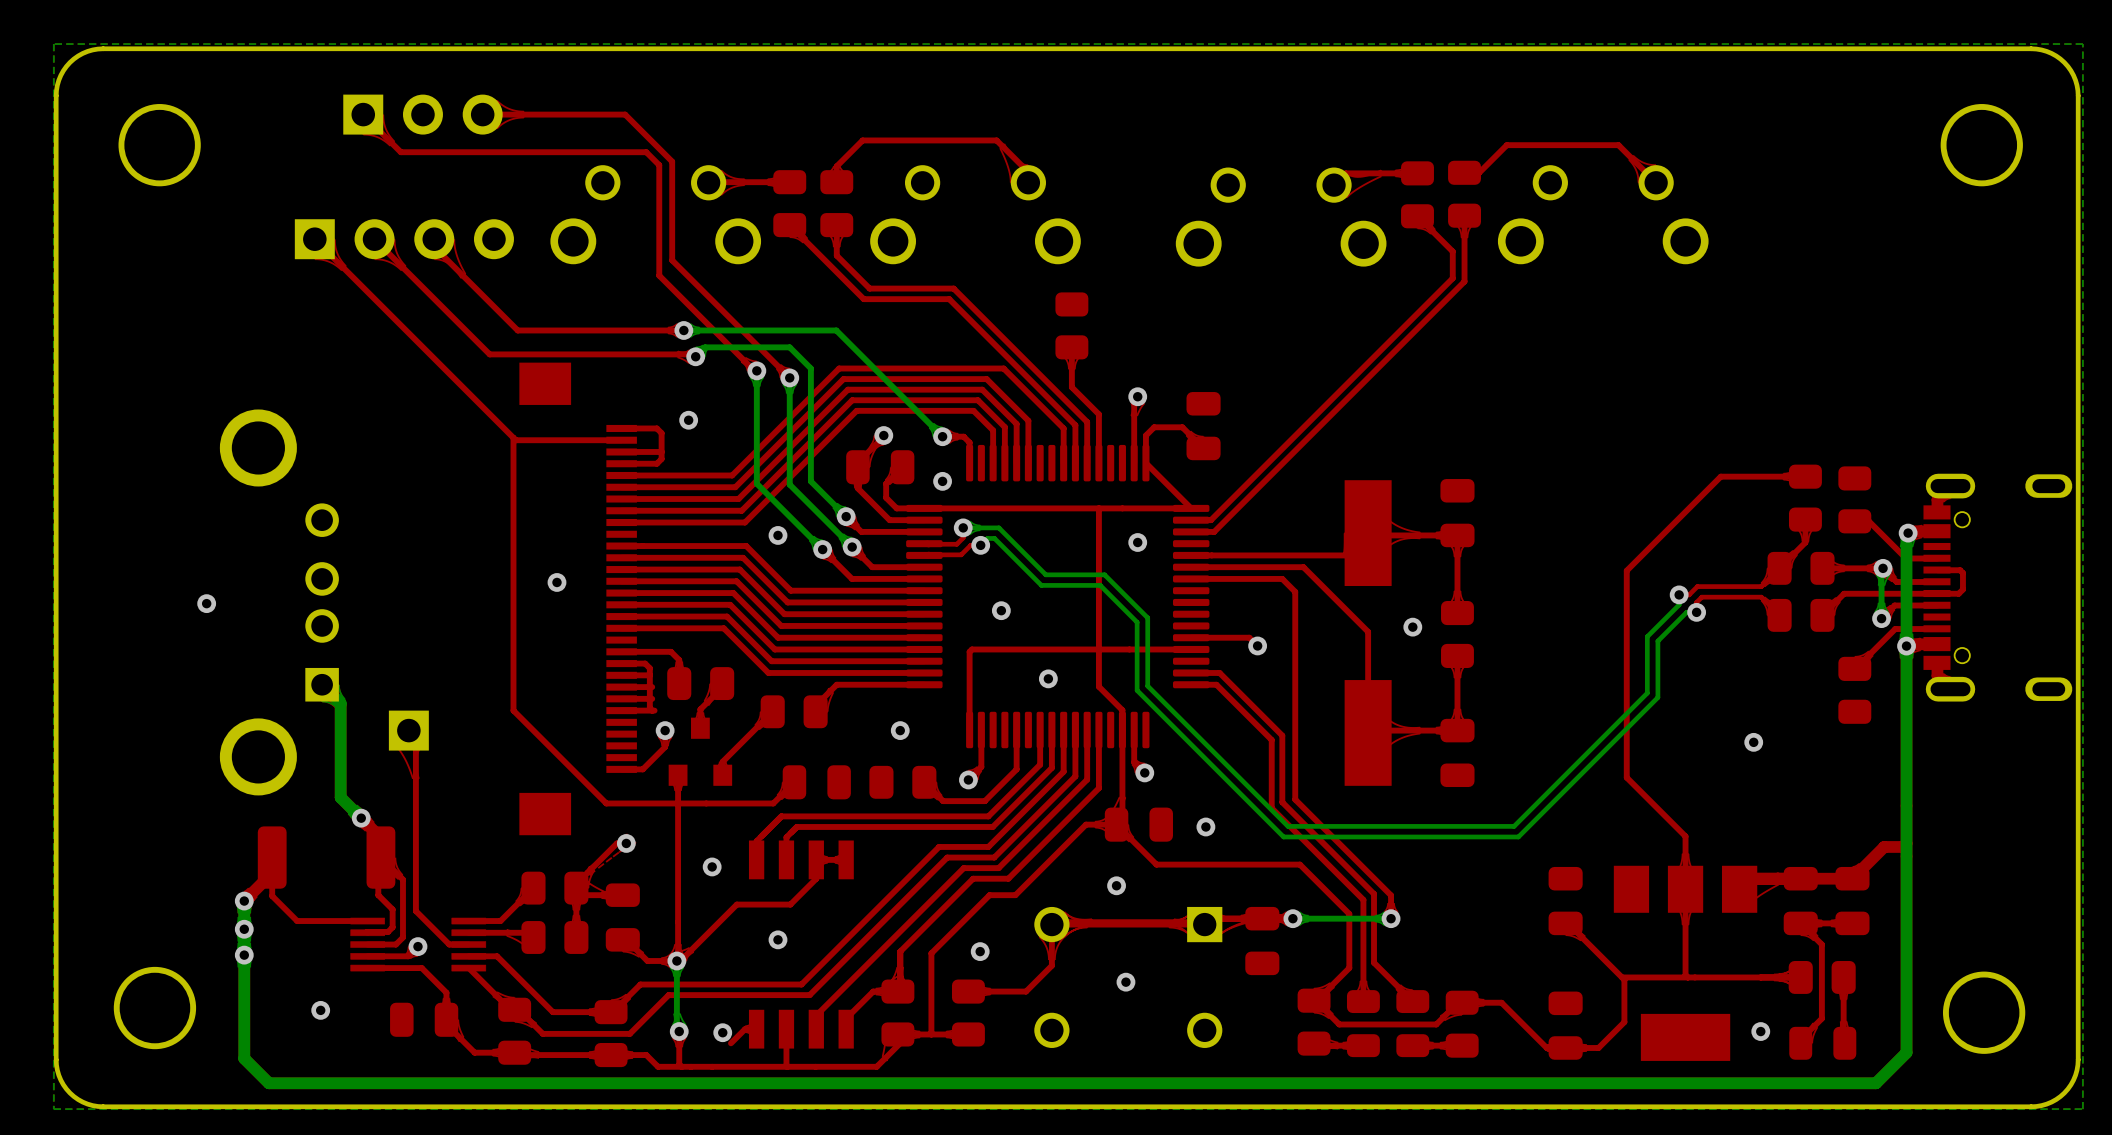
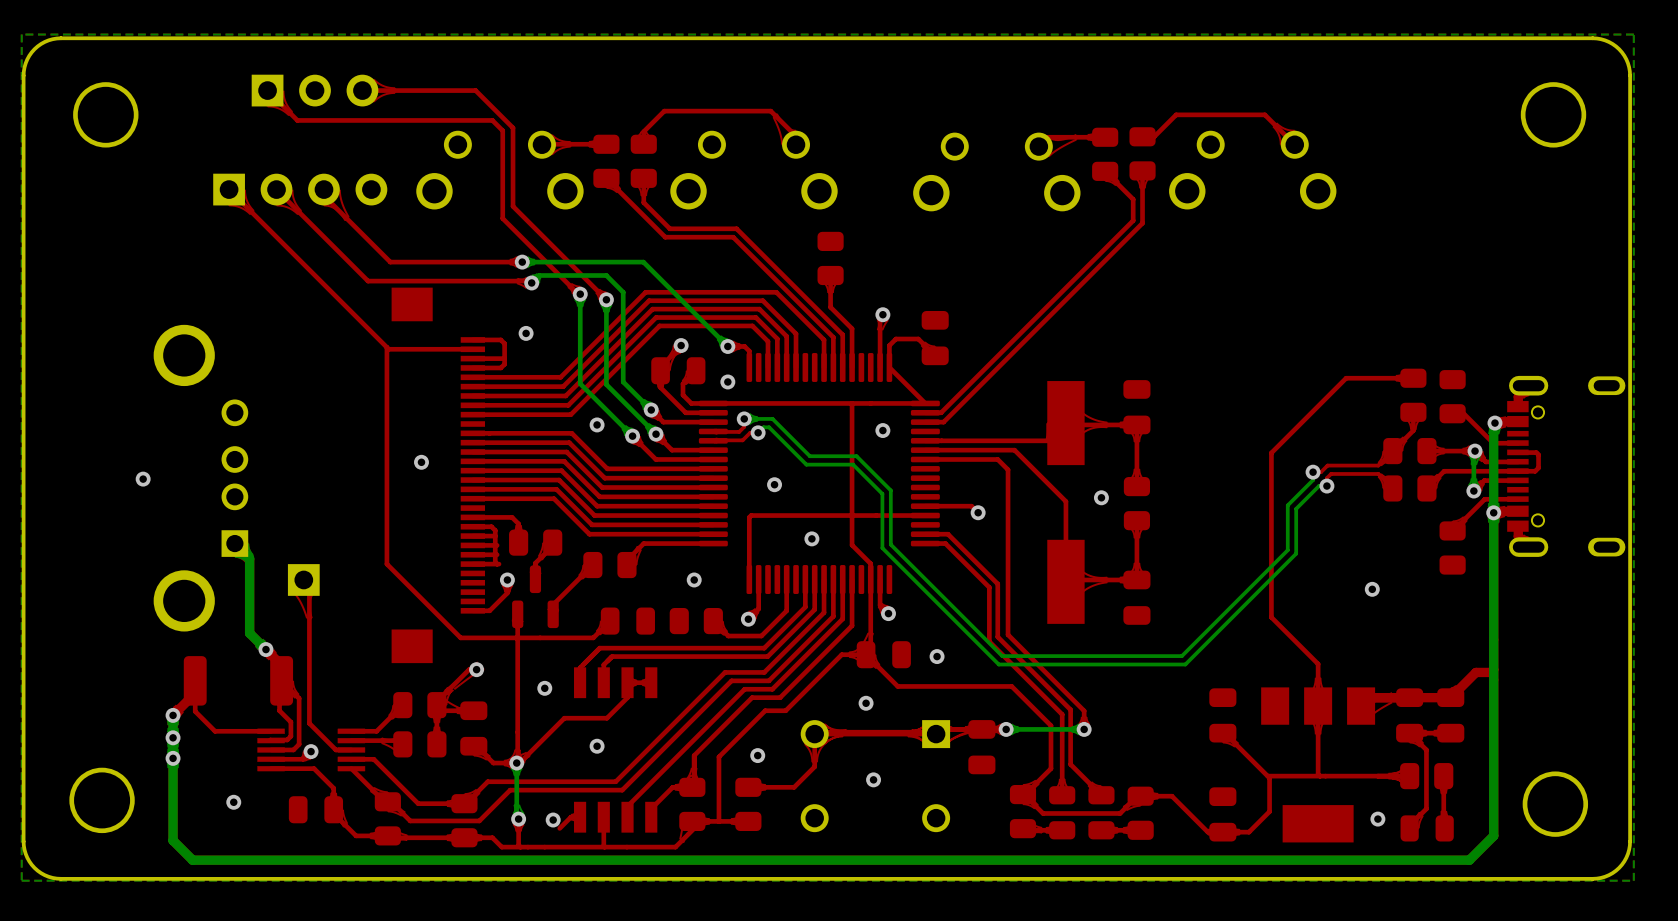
part footprint: [668, 717, 733, 786] -> [512, 565, 559, 629]

